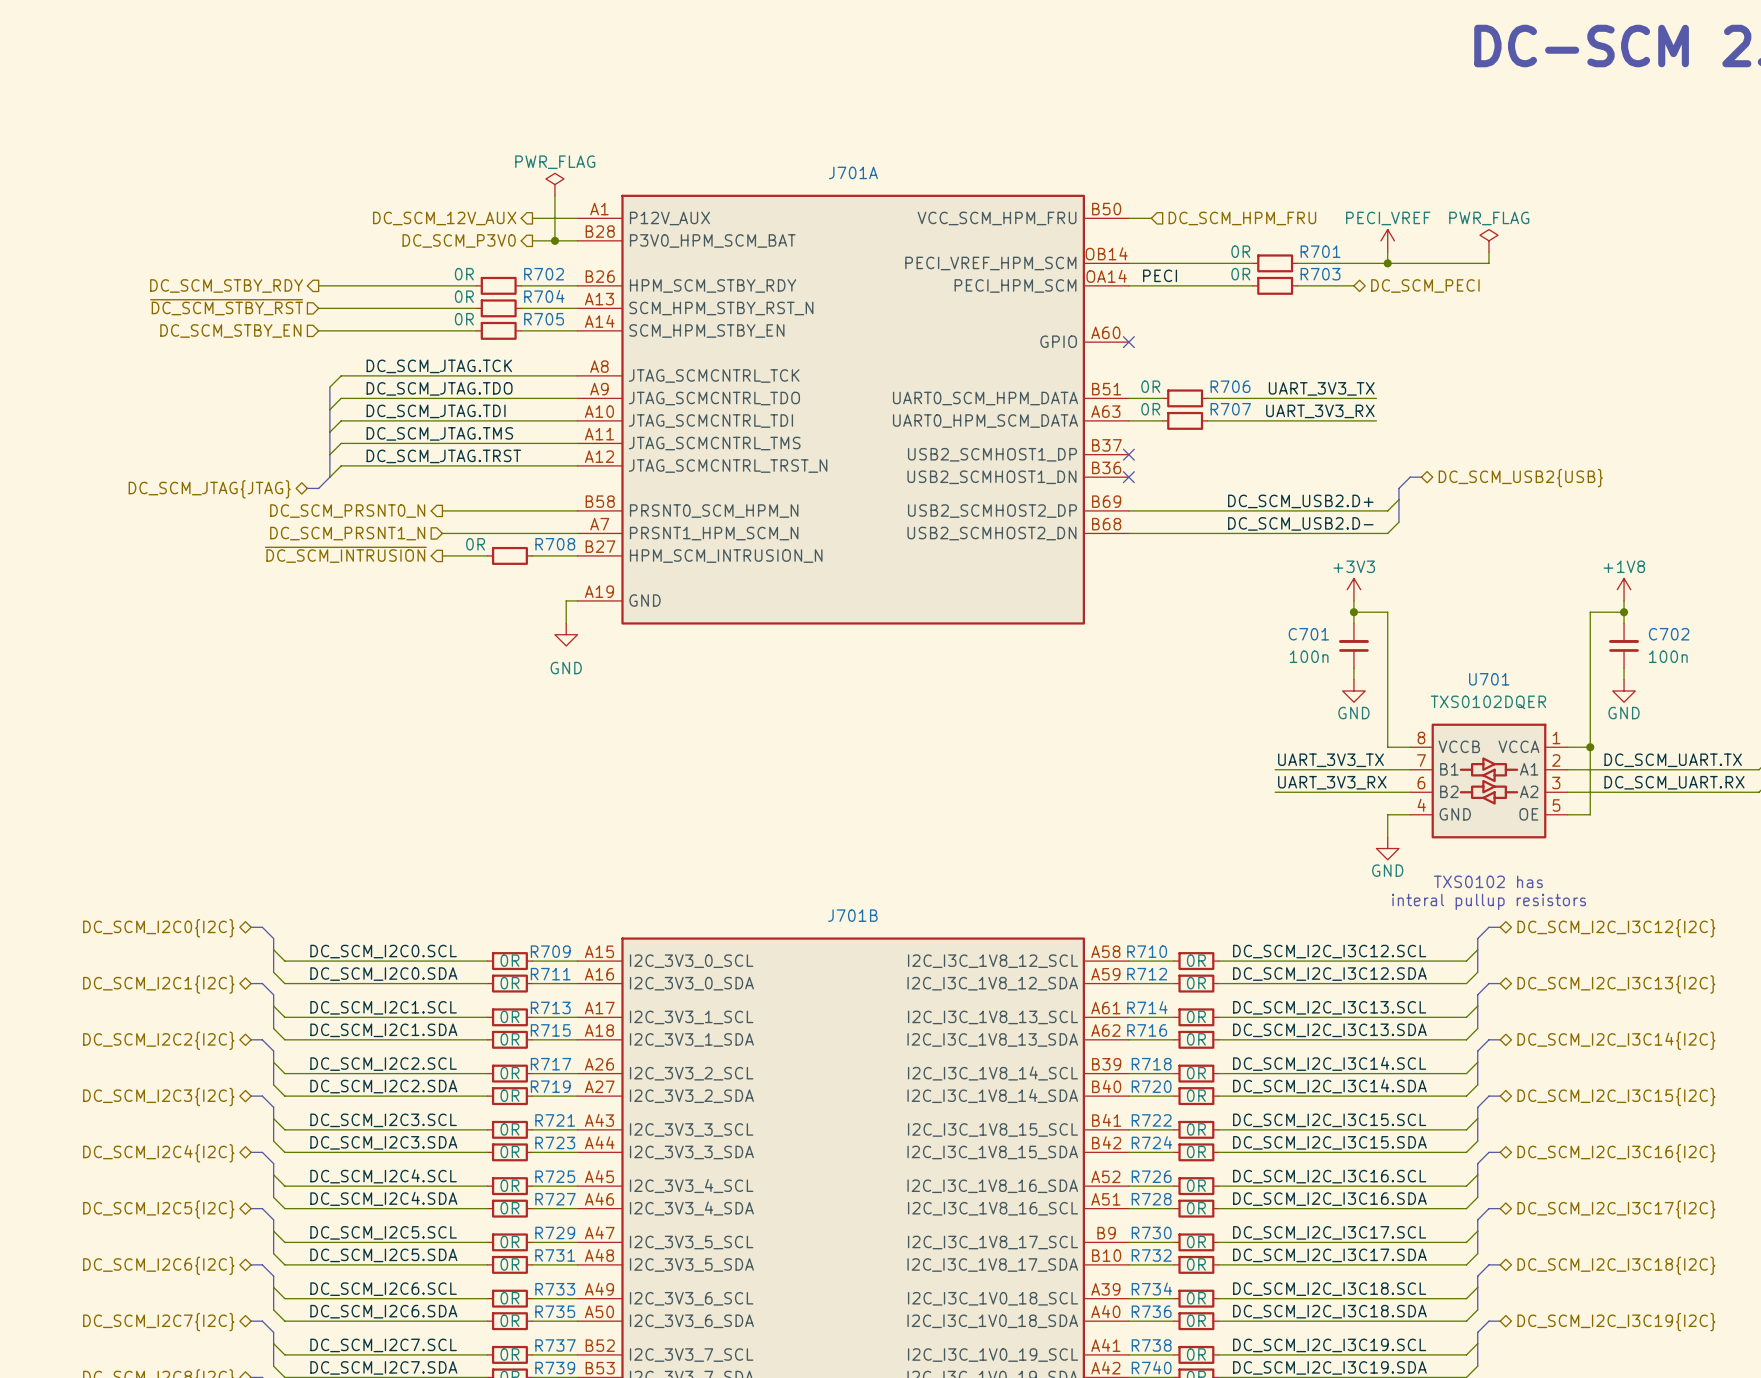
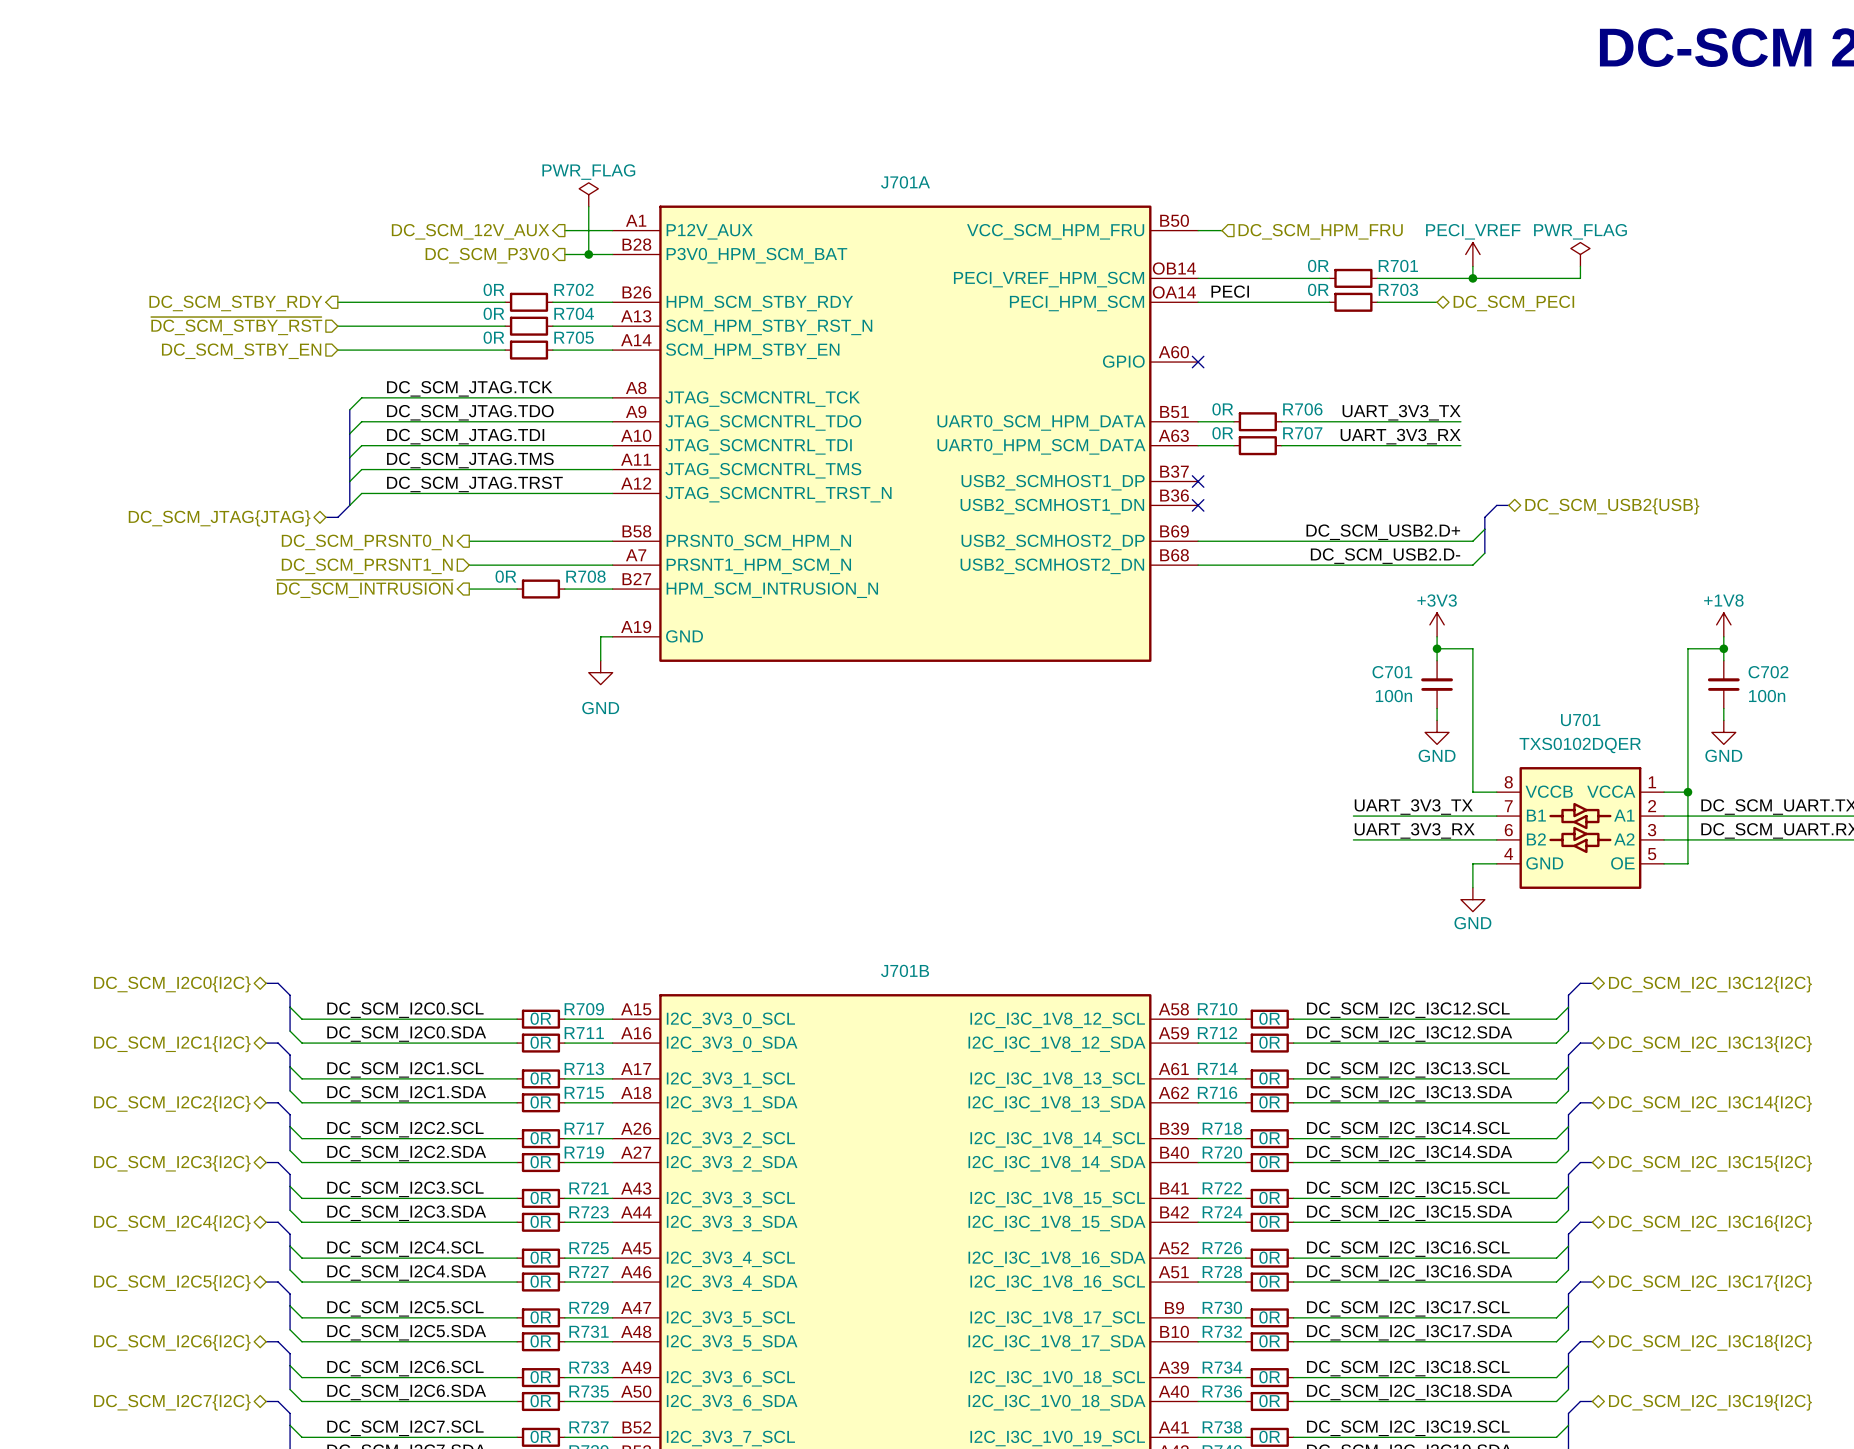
text: TXS0102 has (1488, 881) -> none
text: interal pullup resistors (1488, 901) -> none

